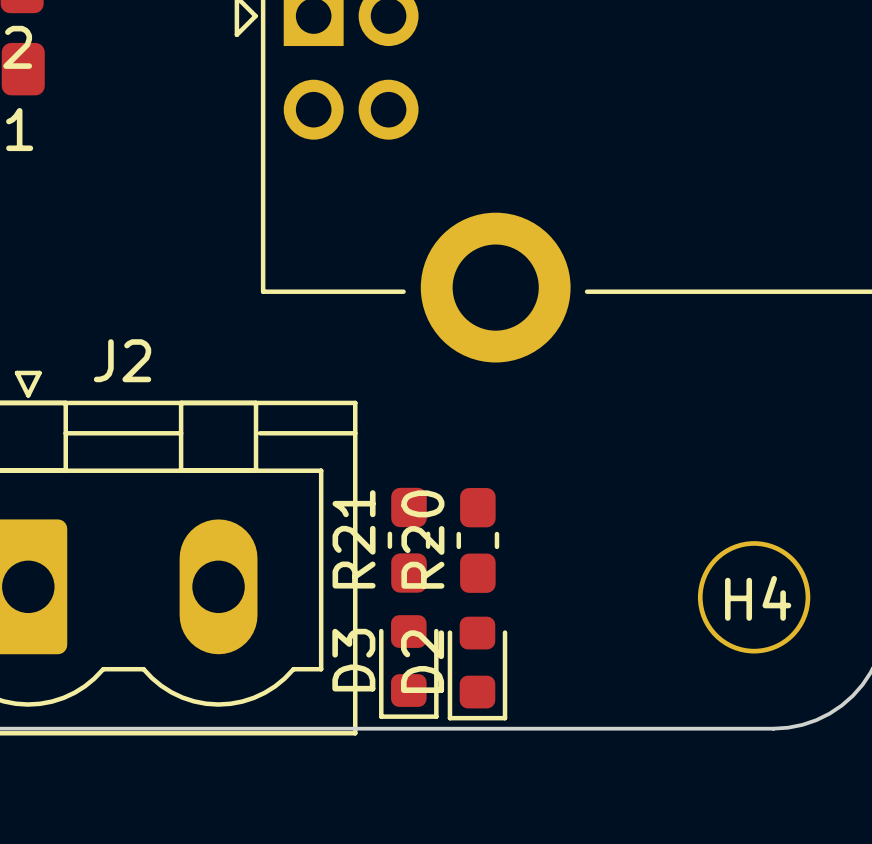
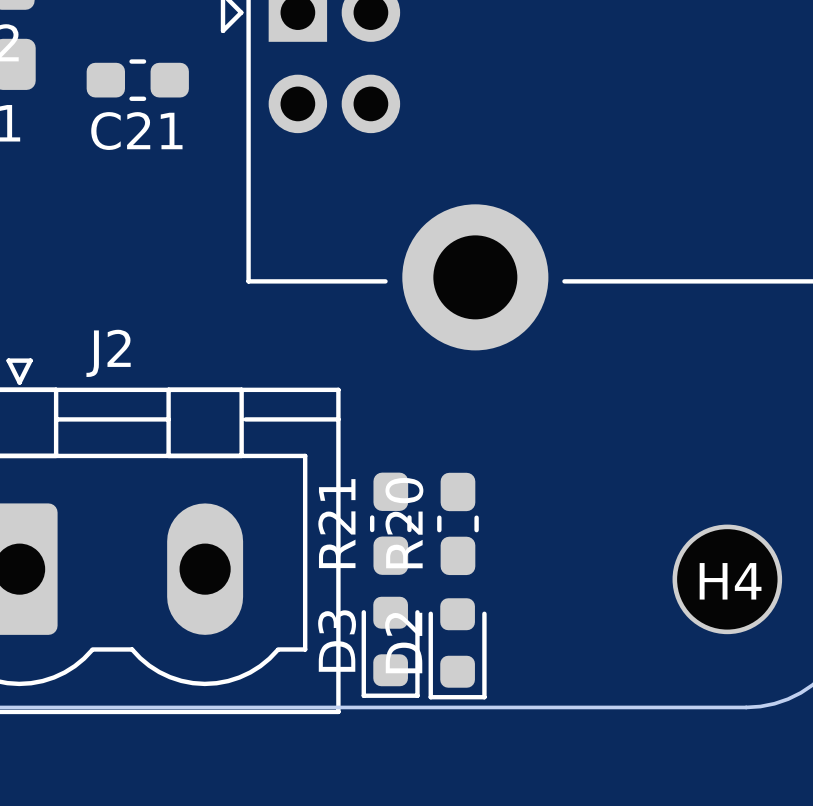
C21: none -> (137, 80)

